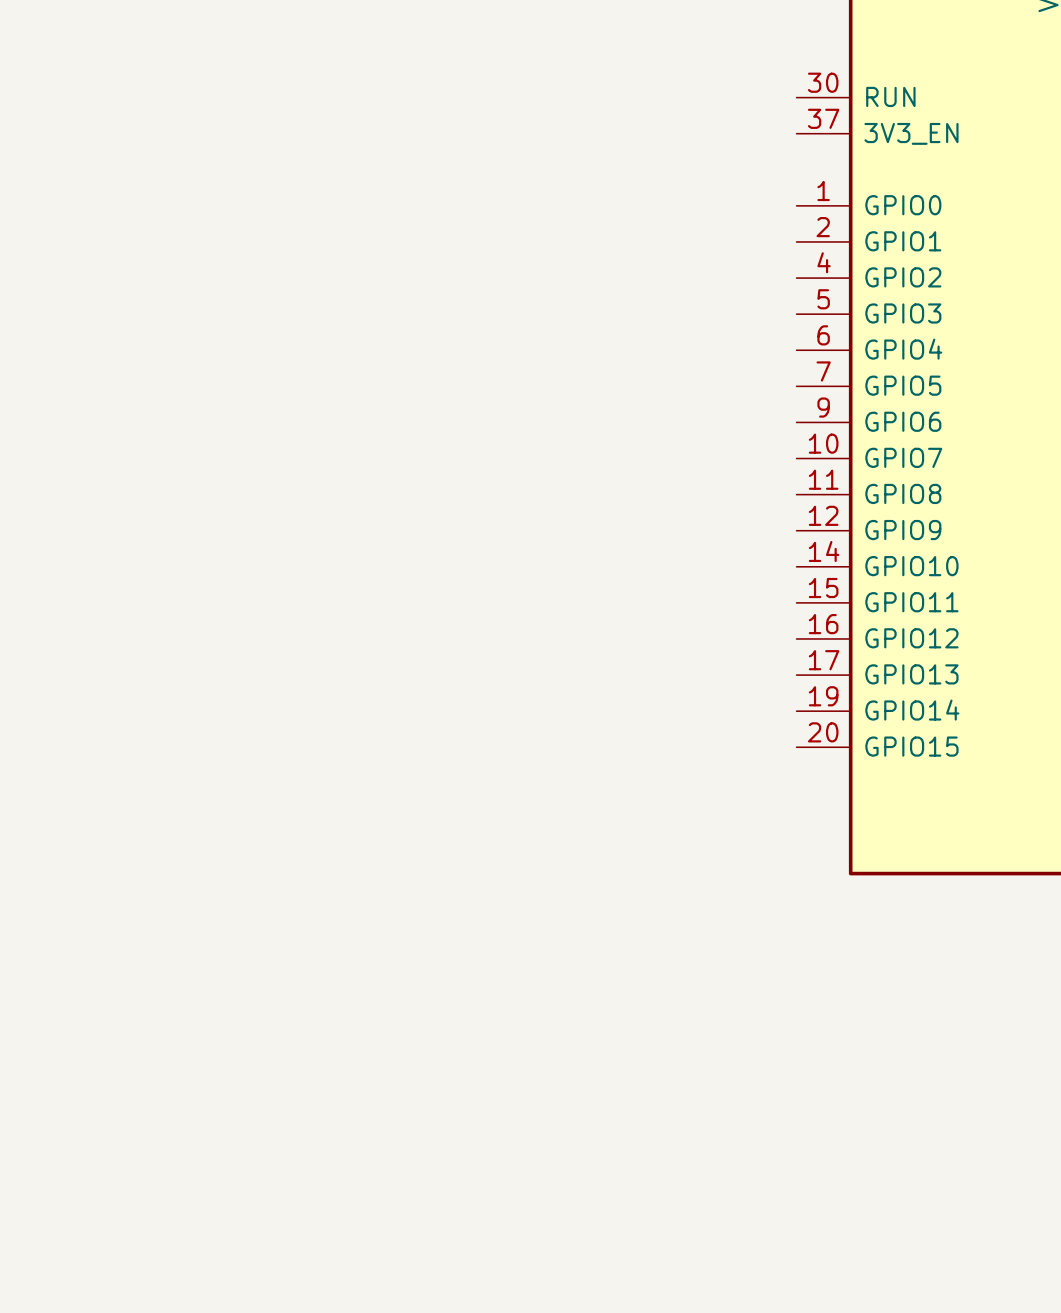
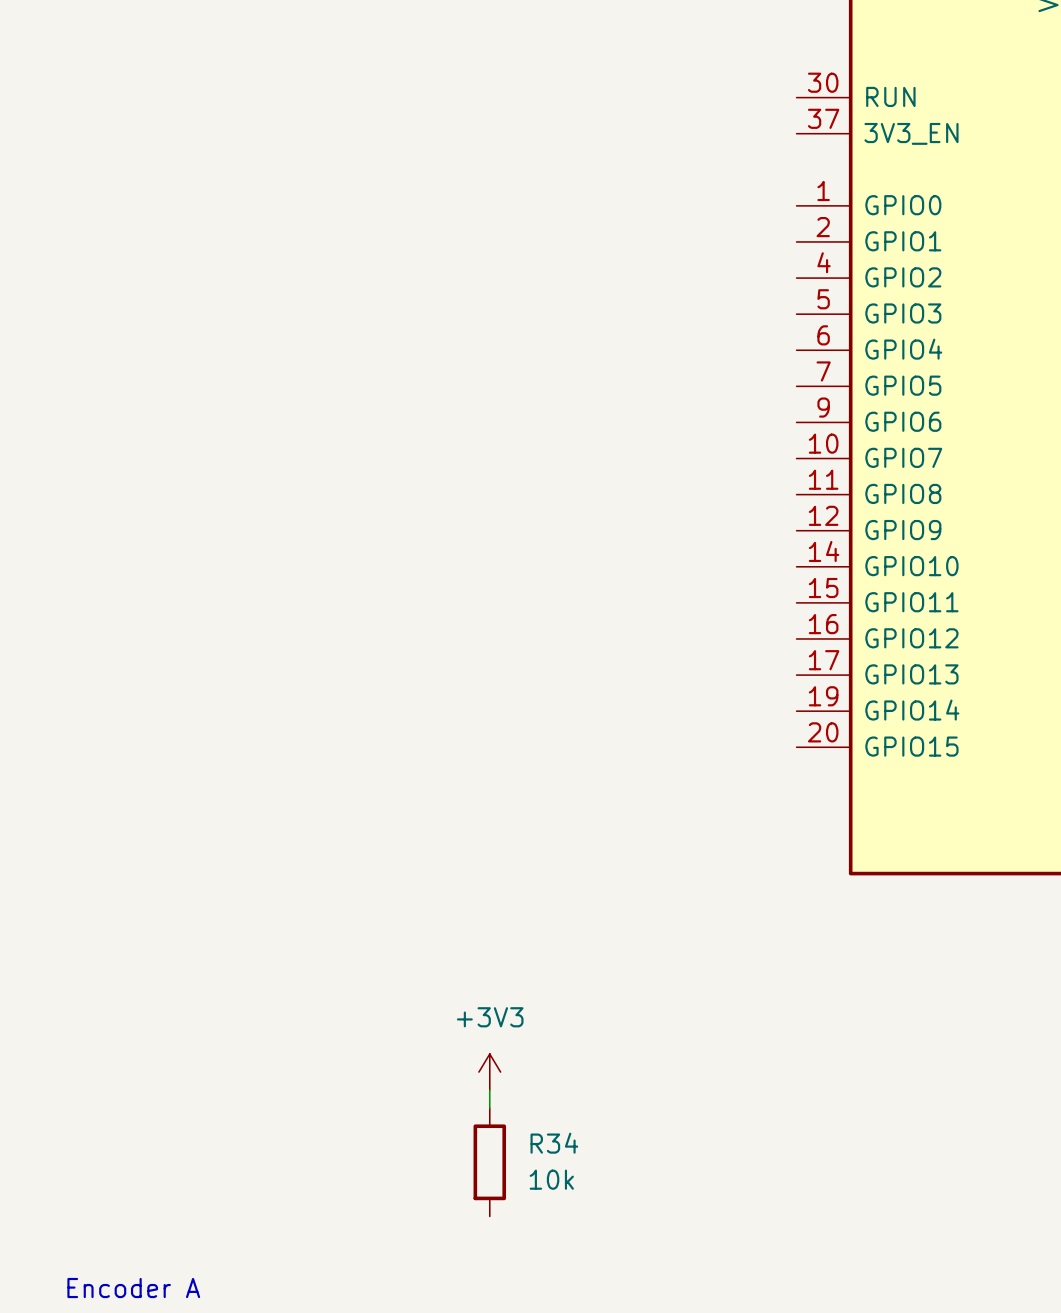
power symbol: none -> +3V3 (489, 1072)
wire: none -> (489, 1090) (489, 1108)
R34: none -> 10k (489, 1162)
text: none -> Encoder A (133, 1288)

